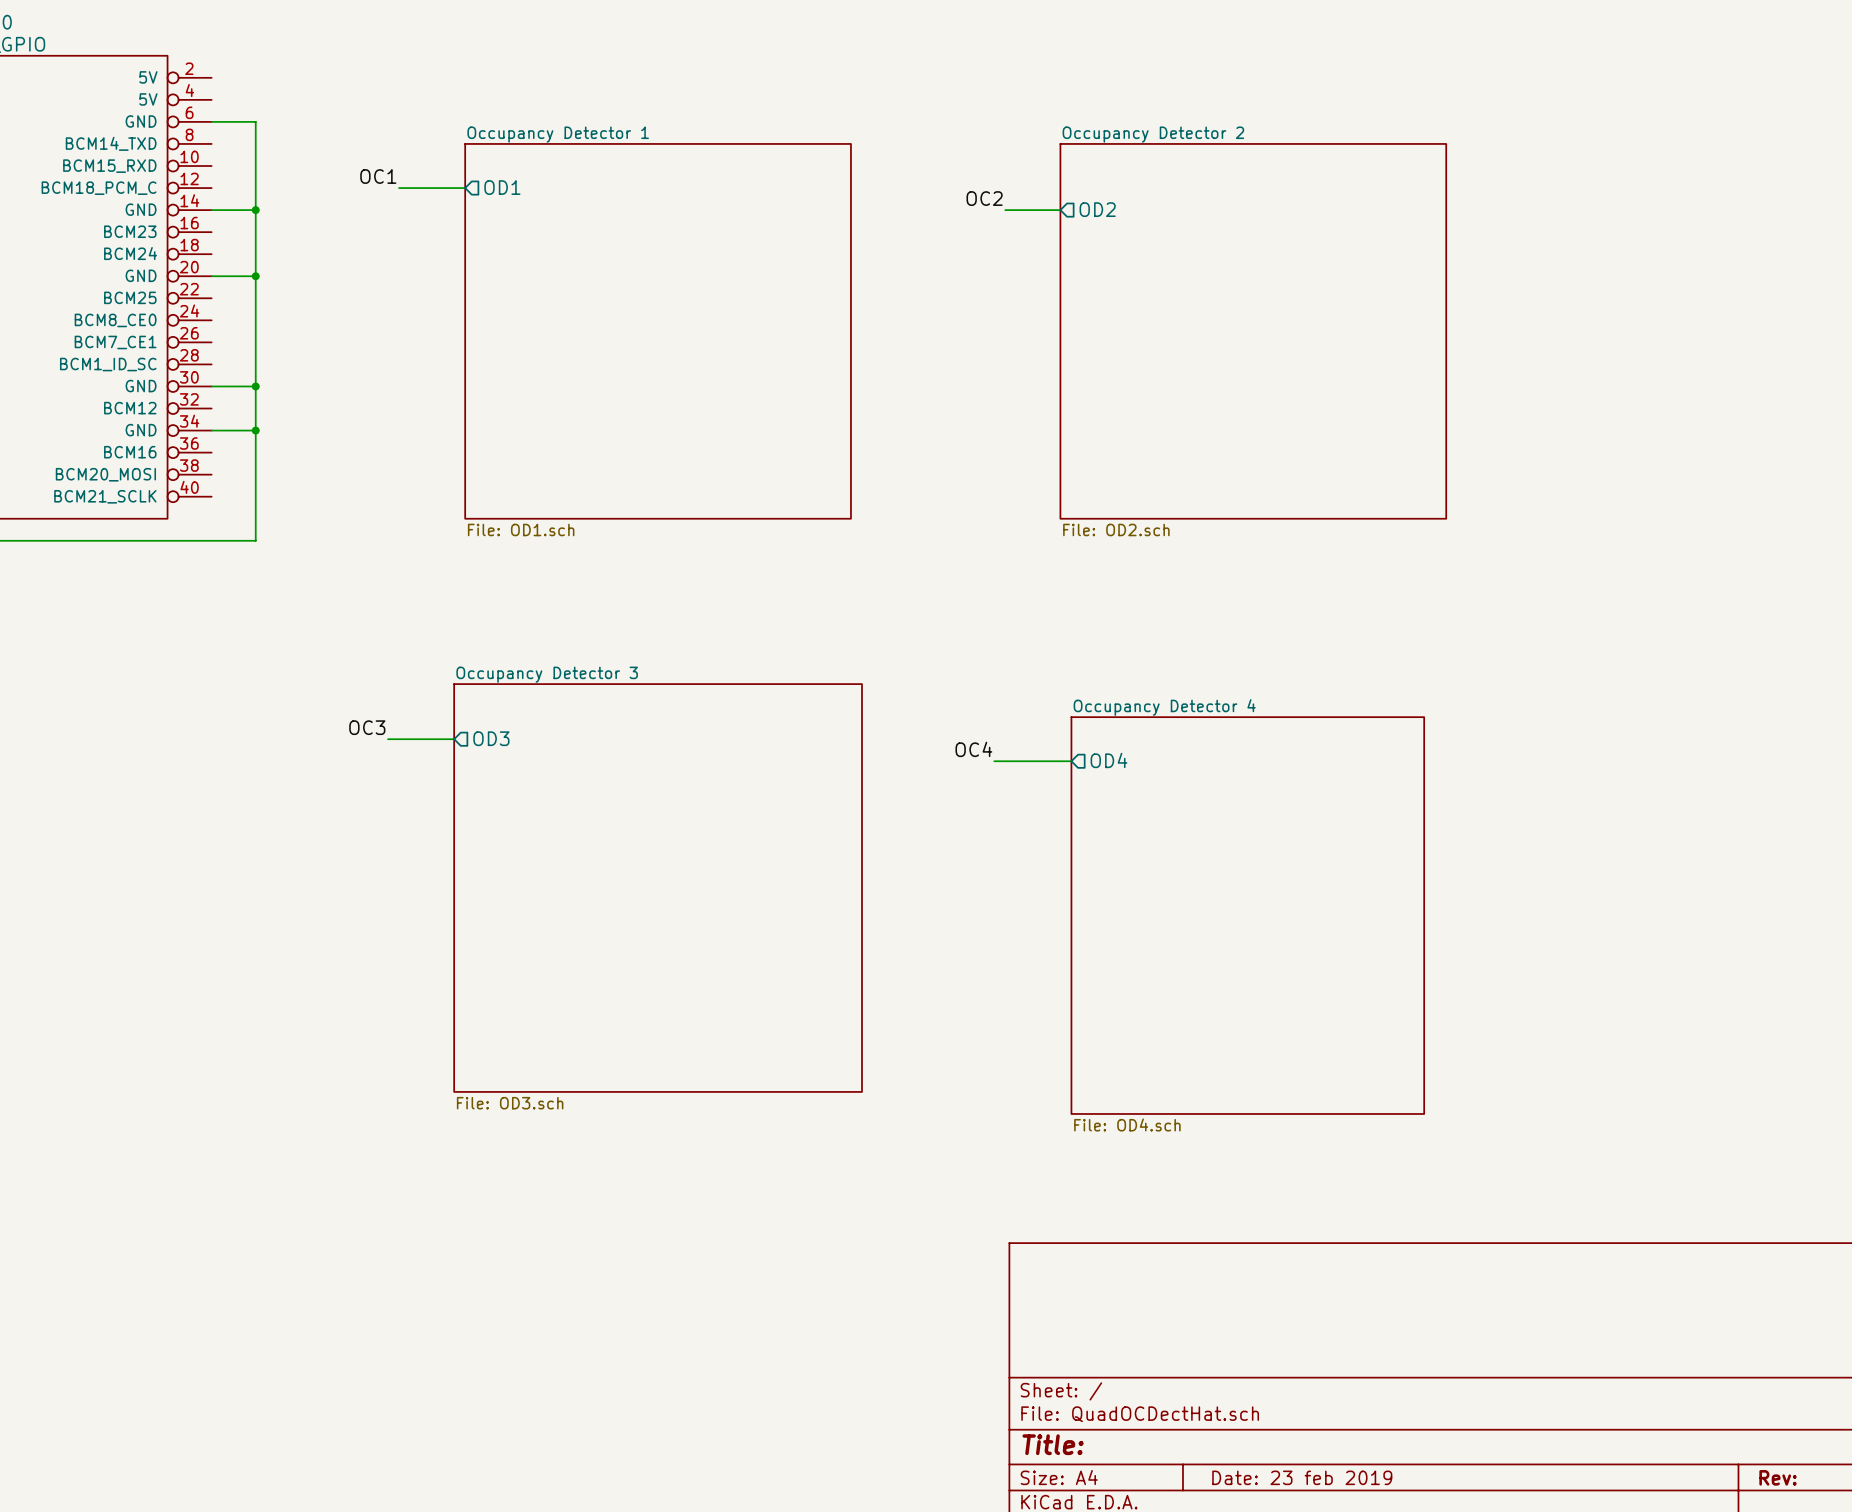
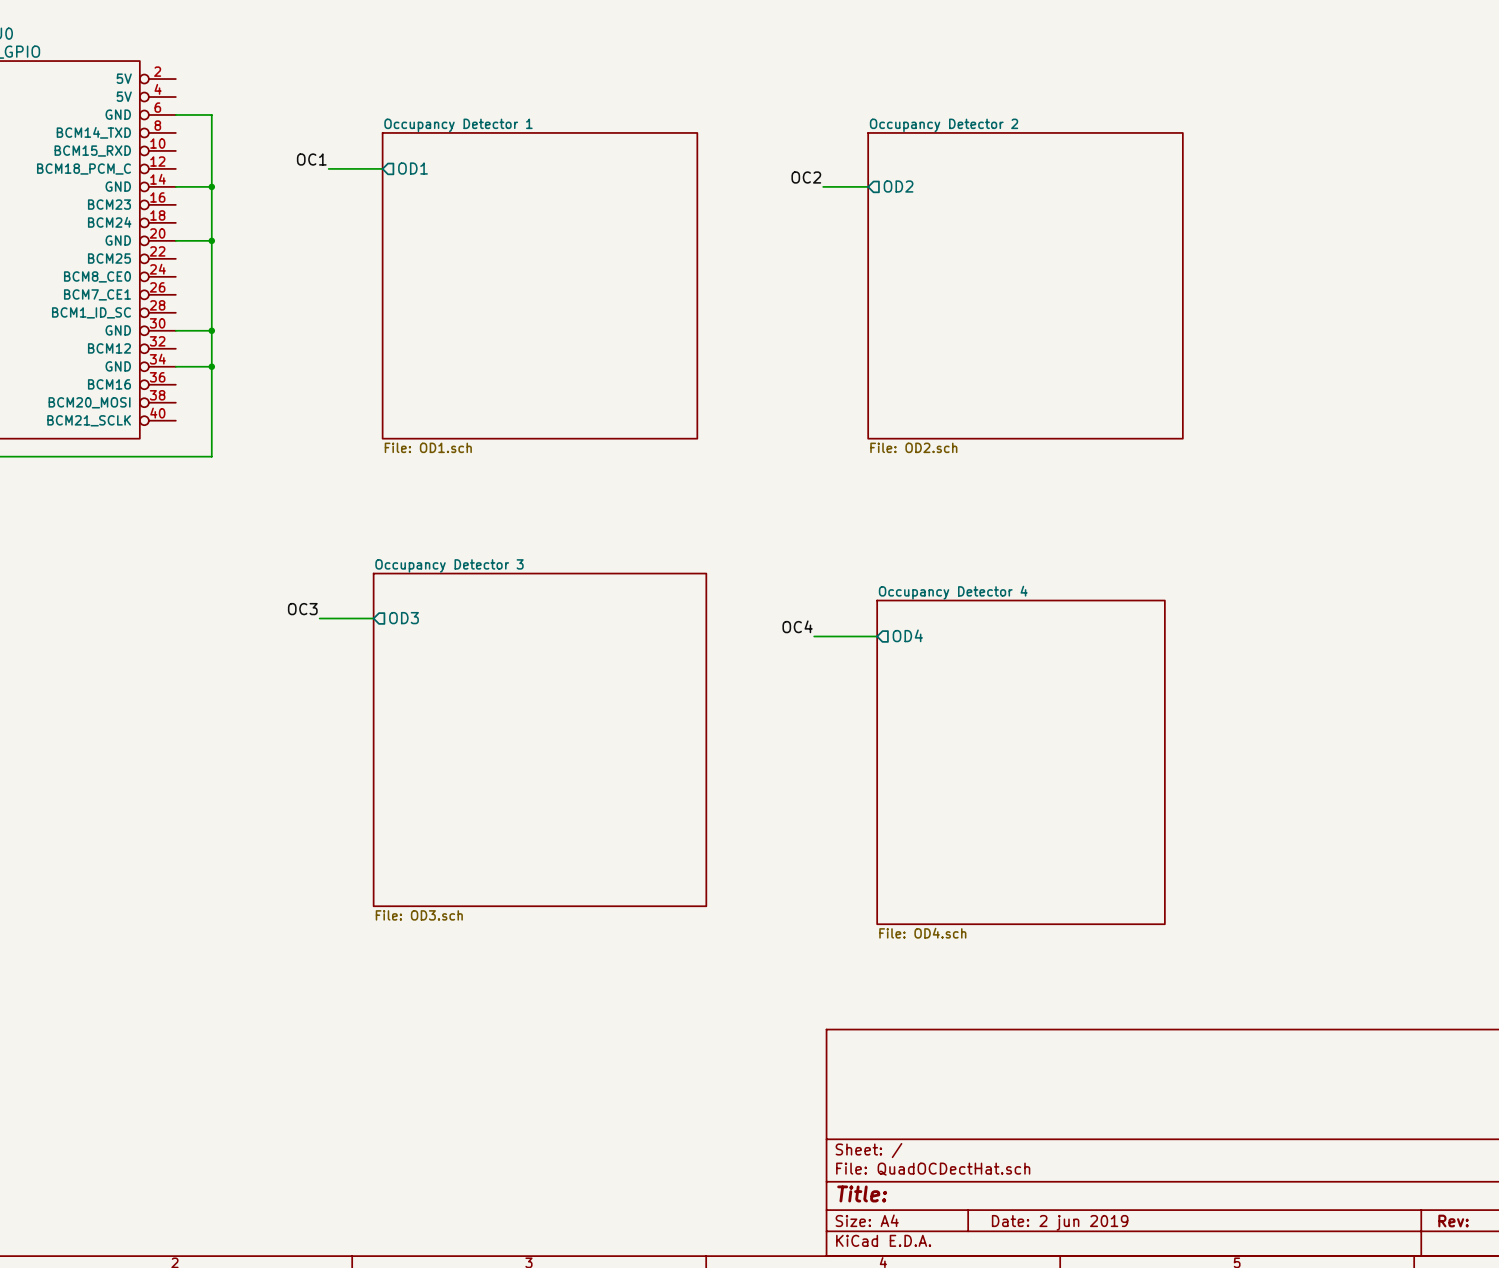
title block: Date: 23 feb 2019 (1302, 1477) -> Date: 2 jun 2019 (1060, 1222)

